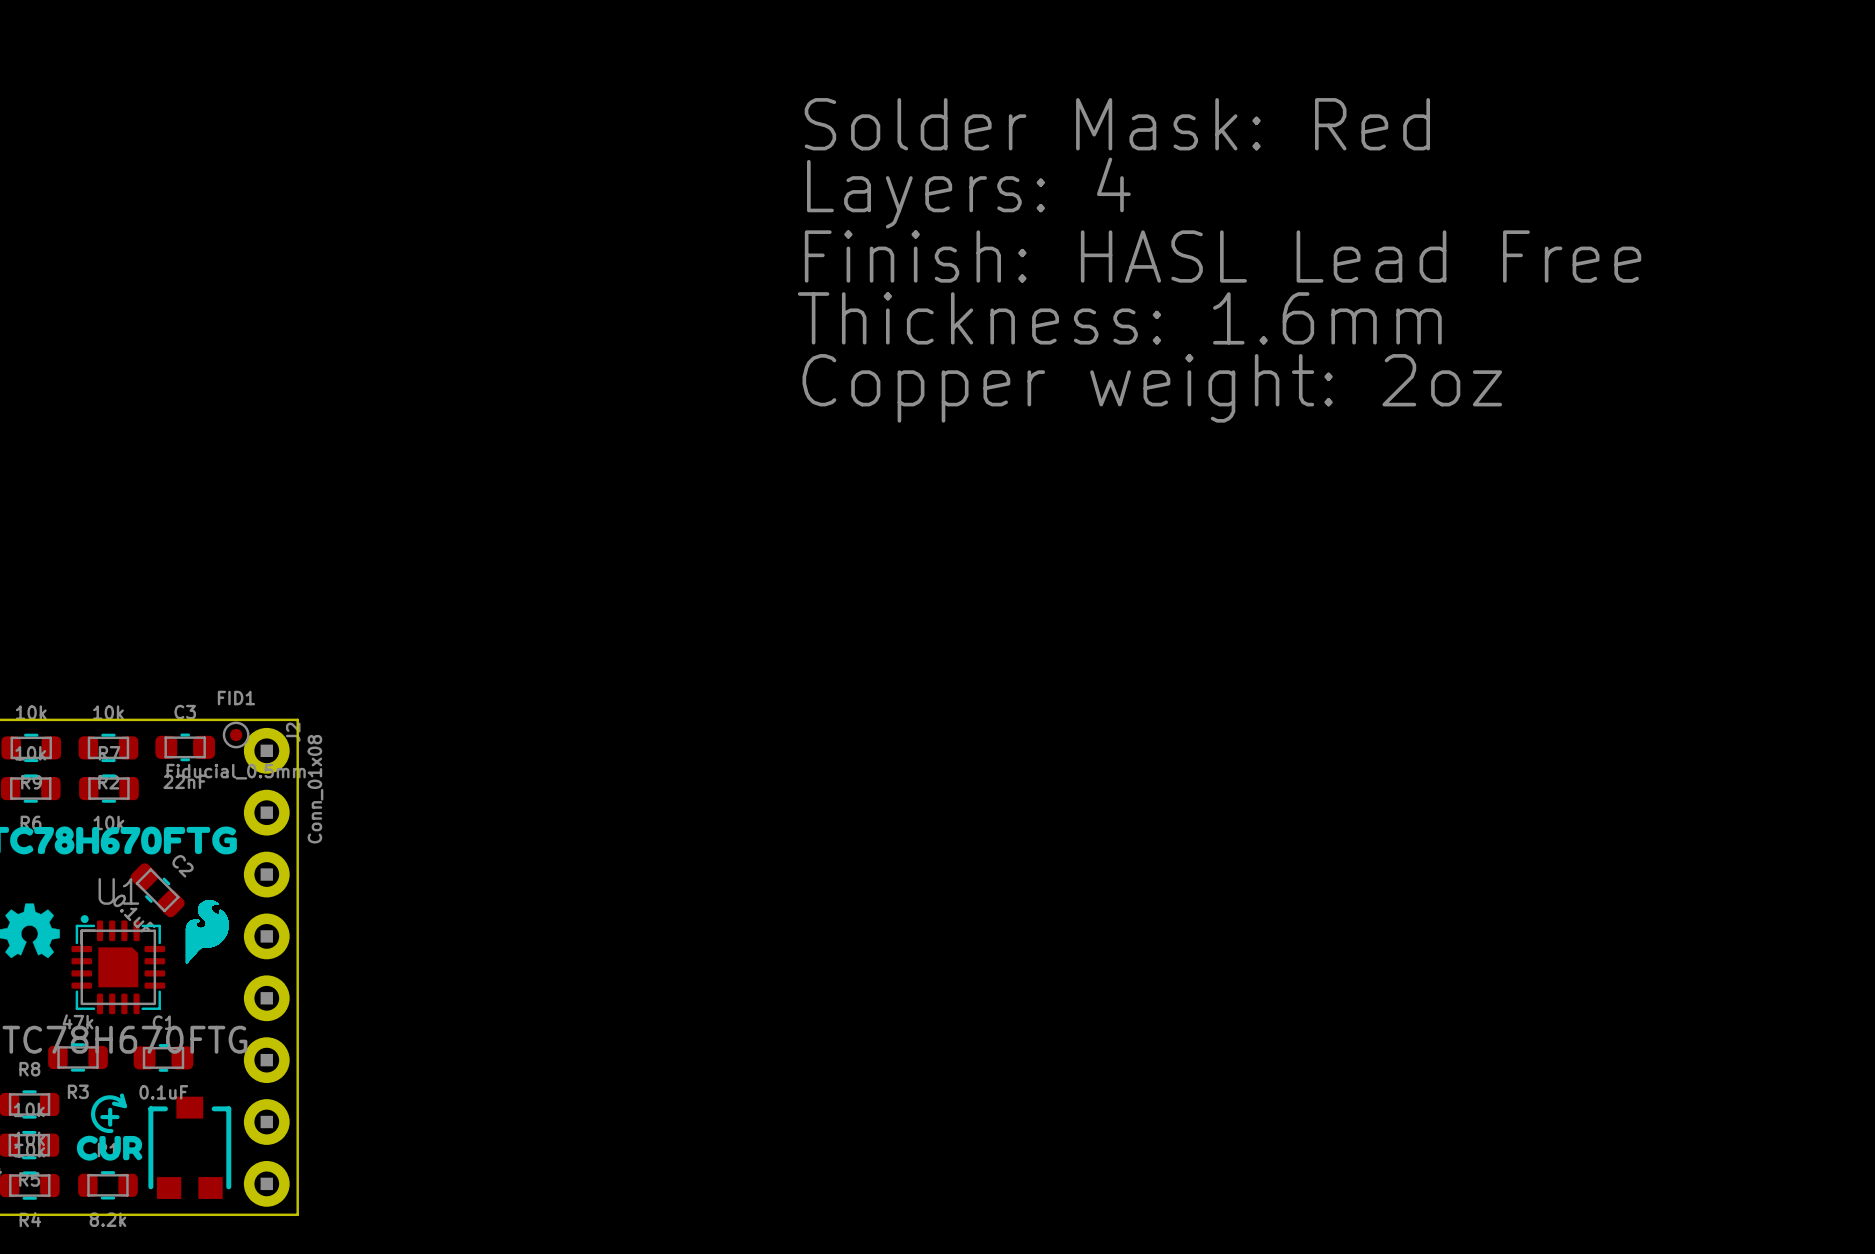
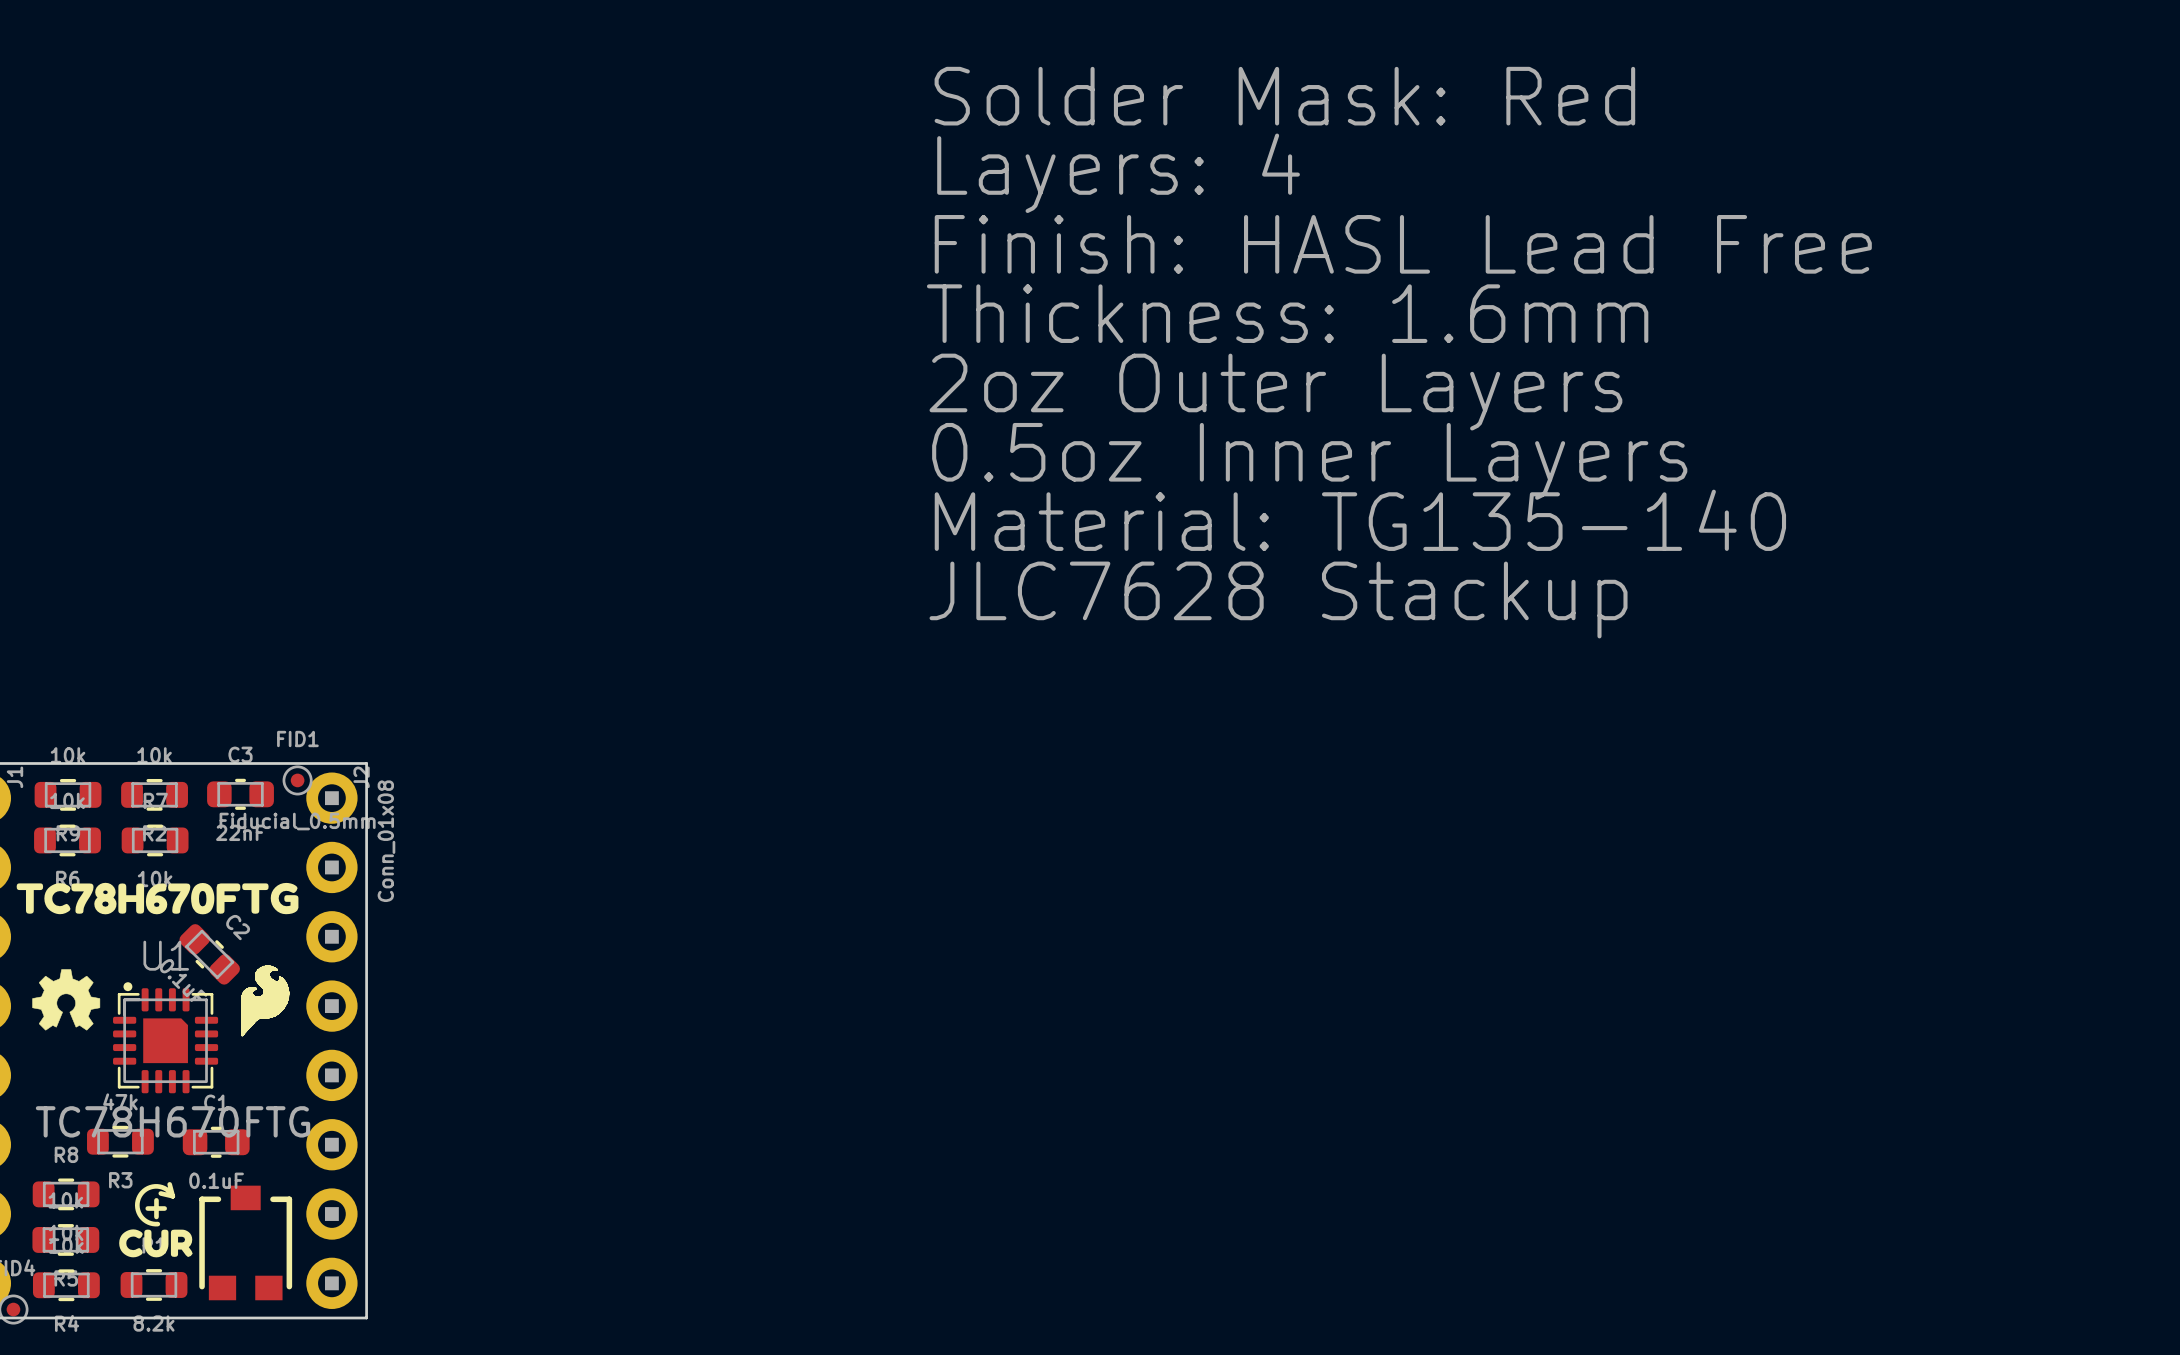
text: Copper weight: 2oz (1152, 388) -> 2oz Outer Layers (1275, 392)
text: none -> 0.5oz Inner Layers (1309, 461)
text: none -> Material: TG135-140 (1360, 520)
text: none -> JLC7628 Stackup (1278, 600)

